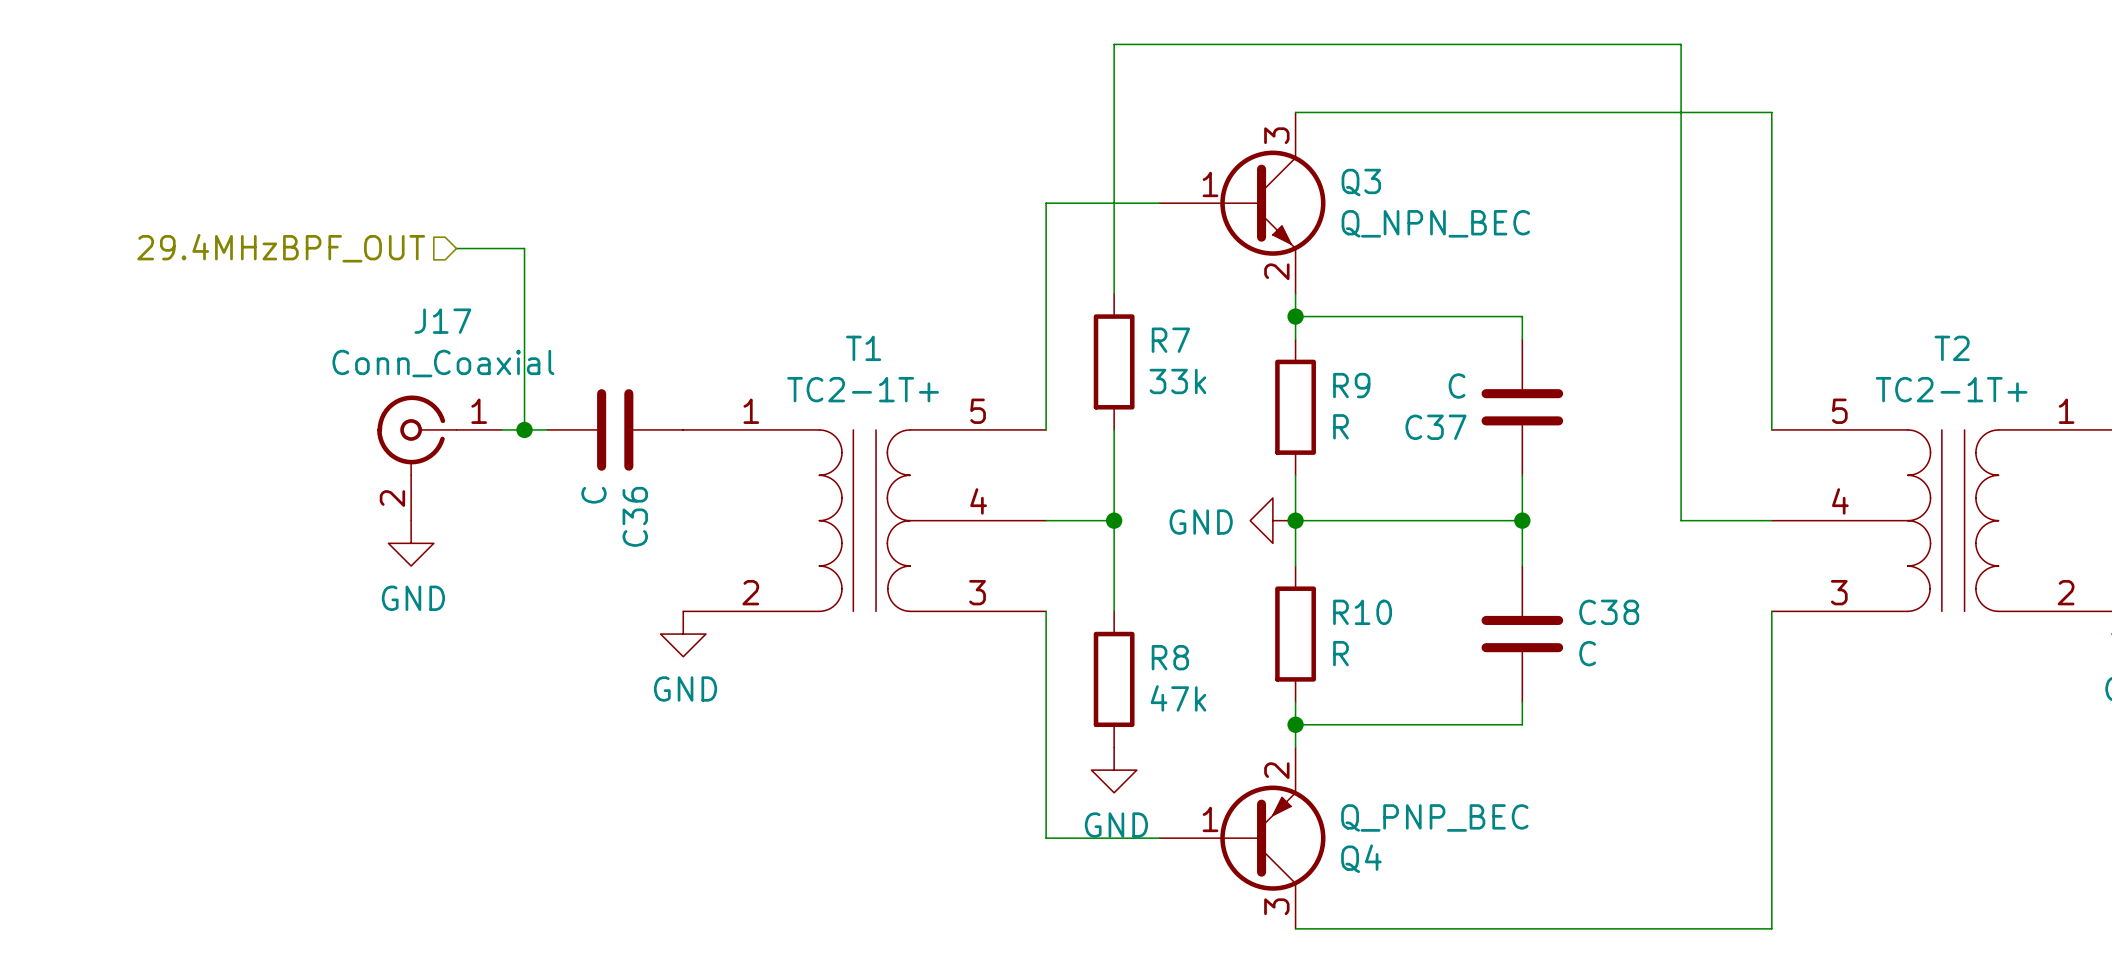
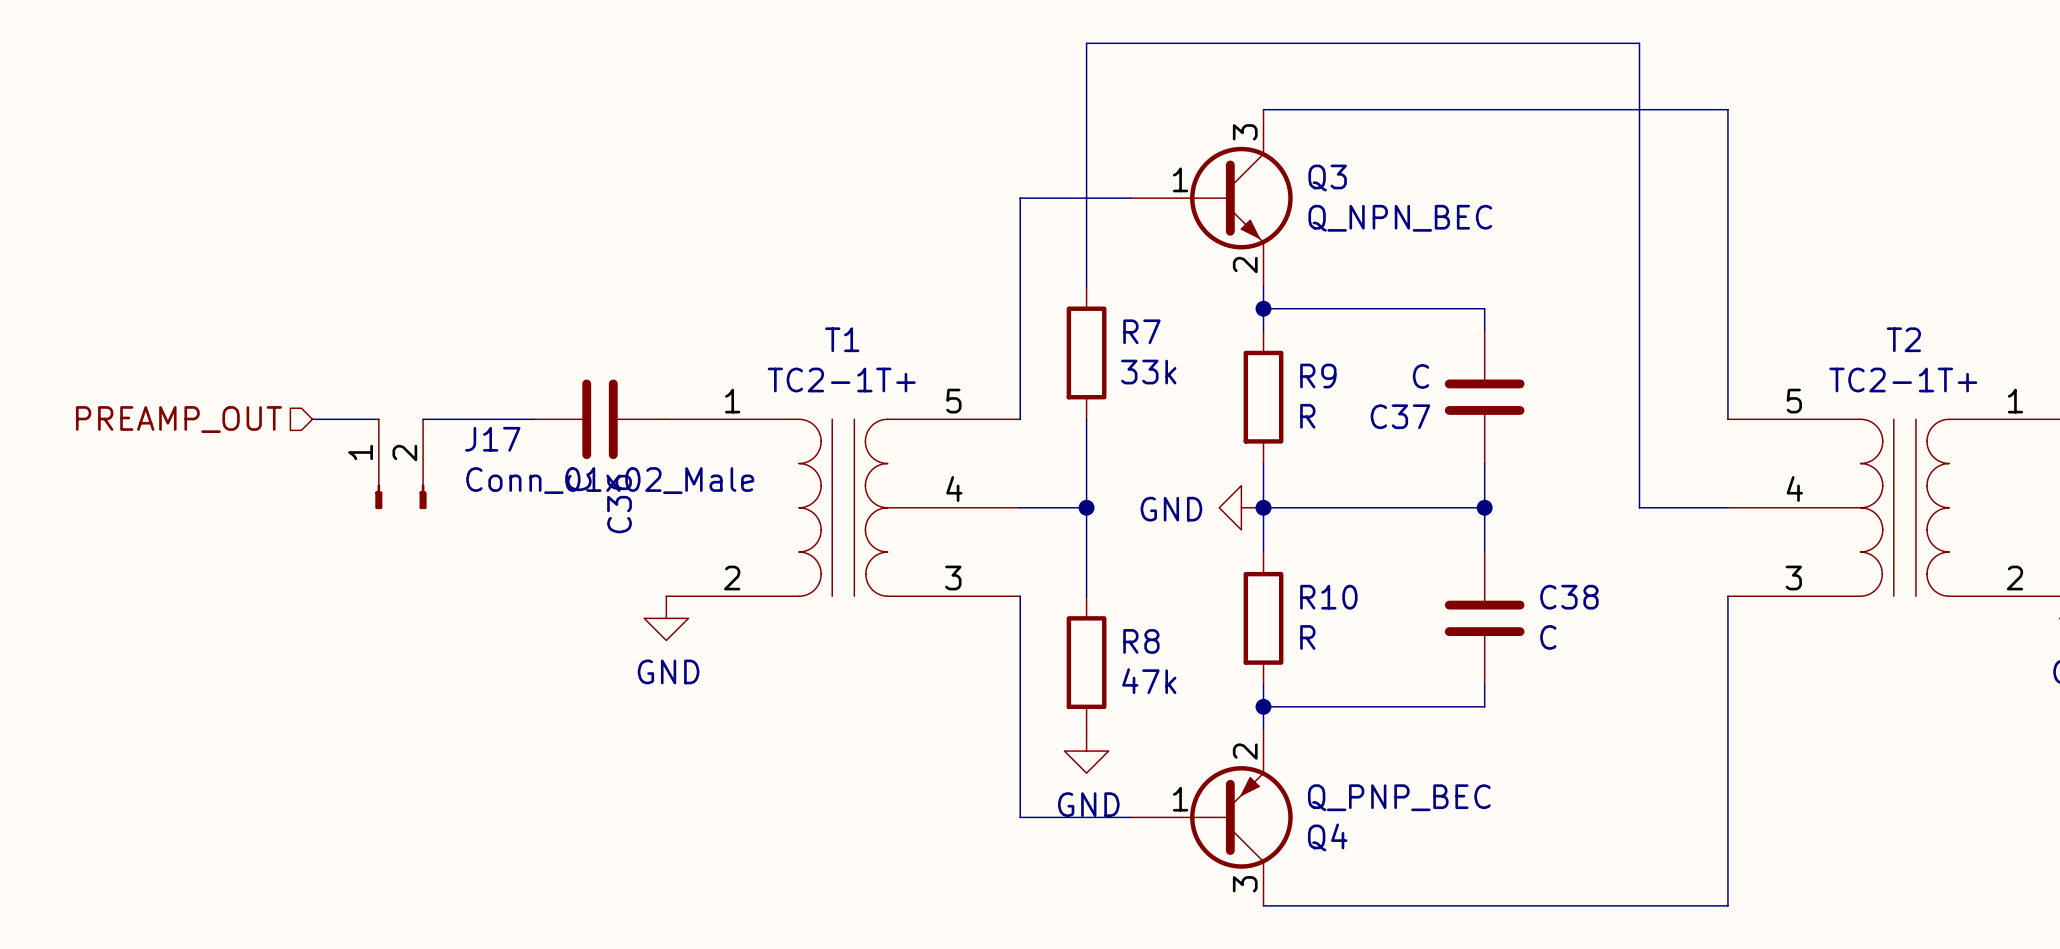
hierarchical label: 29.4MHzBPF_OUT (281, 248) -> none
wire: (456, 248) (524, 248) (524, 429) -> none
J17 name position: J17 (442, 321) -> J17 (492, 439)
J17 value: Conn_Coaxial (443, 363) -> Conn_01x02_Male (610, 480)
J17 symbol: [377, 395, 502, 521] -> [375, 419, 427, 510]
wire: none -> (312, 419) (378, 419)
junction: (524, 429) -> none
hierarchical label: none -> PREAMP_OUT (178, 419)
power symbol: GND (411, 543) -> none

